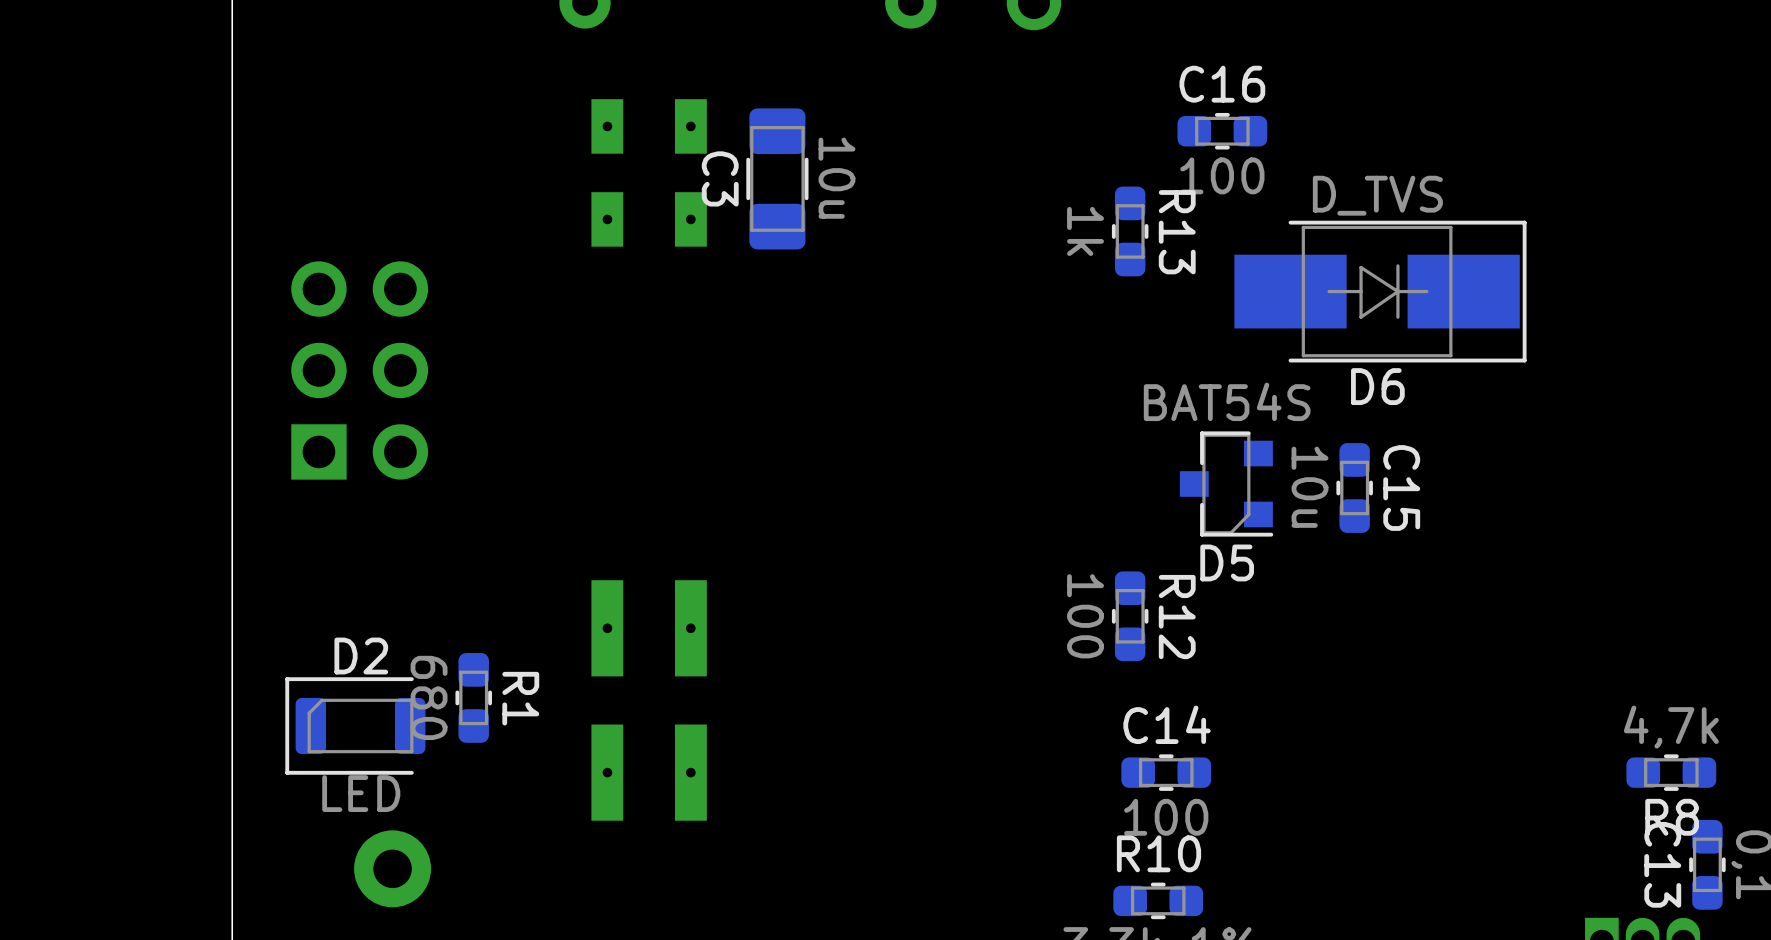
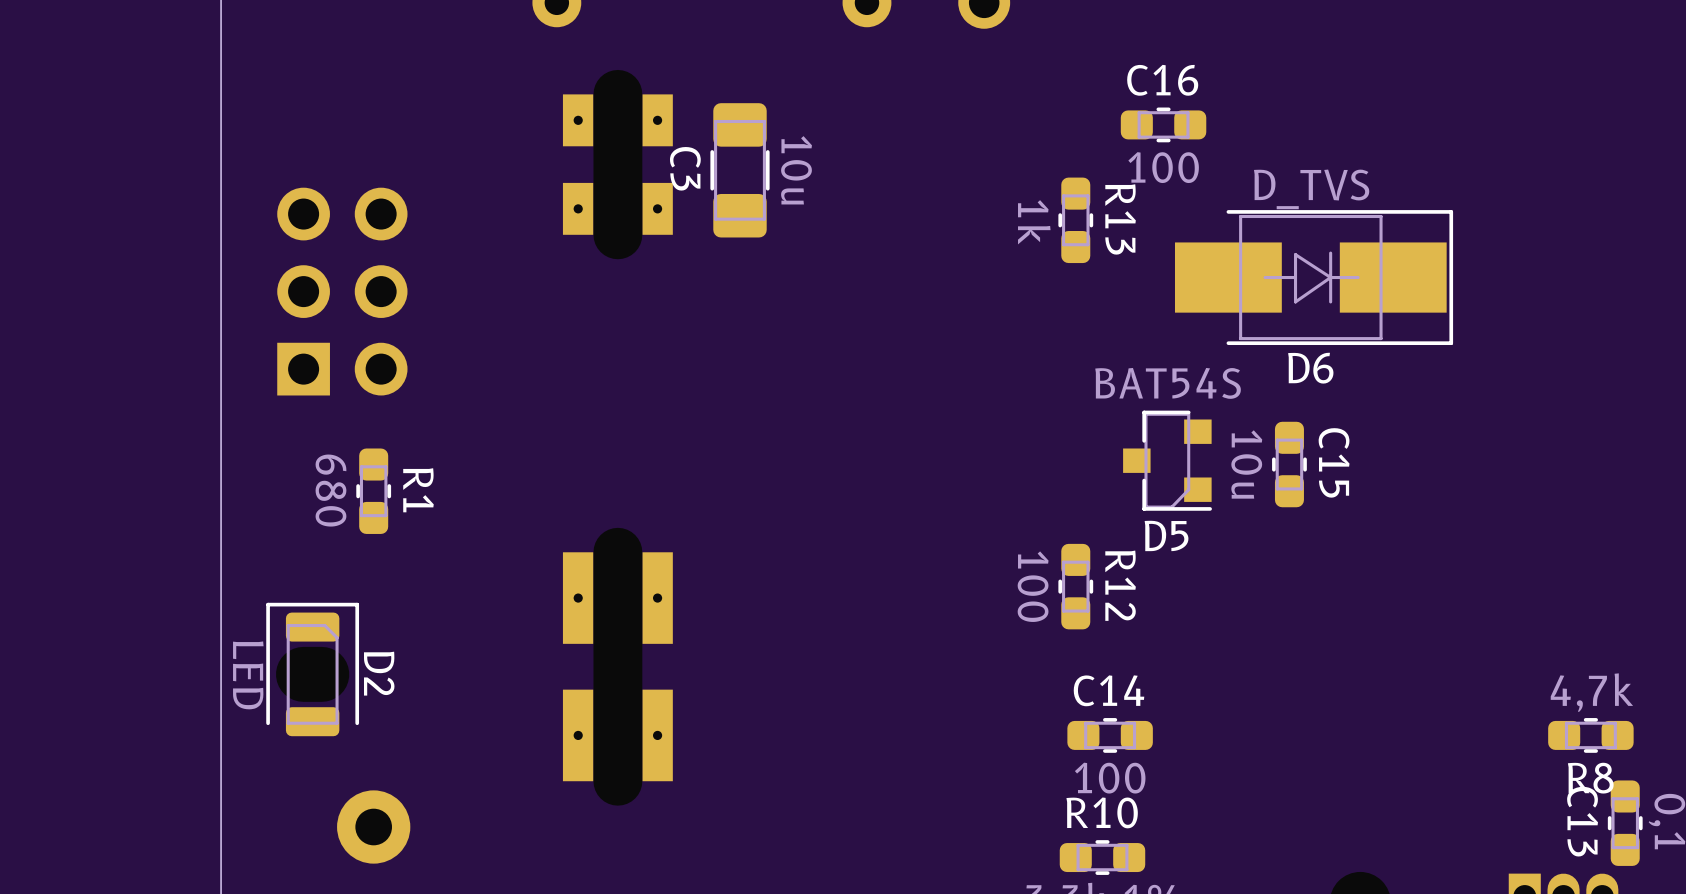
part position: (359, 370) -> (342, 291)
R1 position: (473, 697) -> (373, 491)
D2 rotation: 0° (355, 725) -> 90° clockwise (312, 669)

